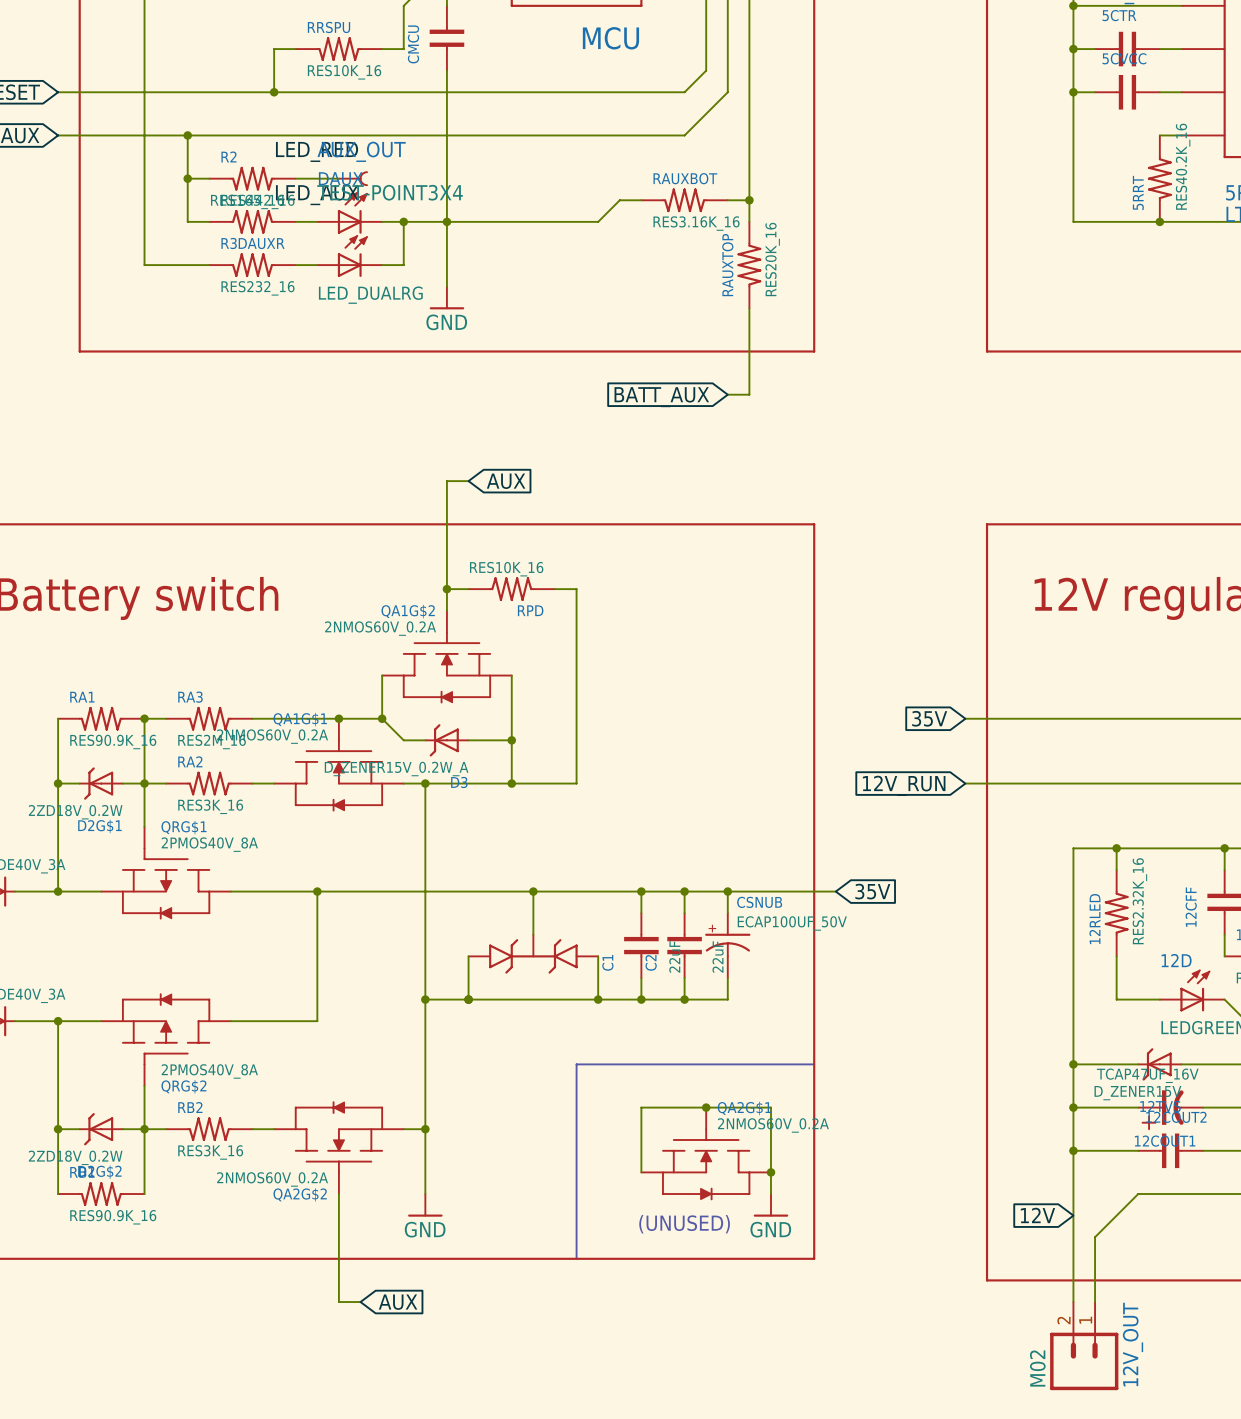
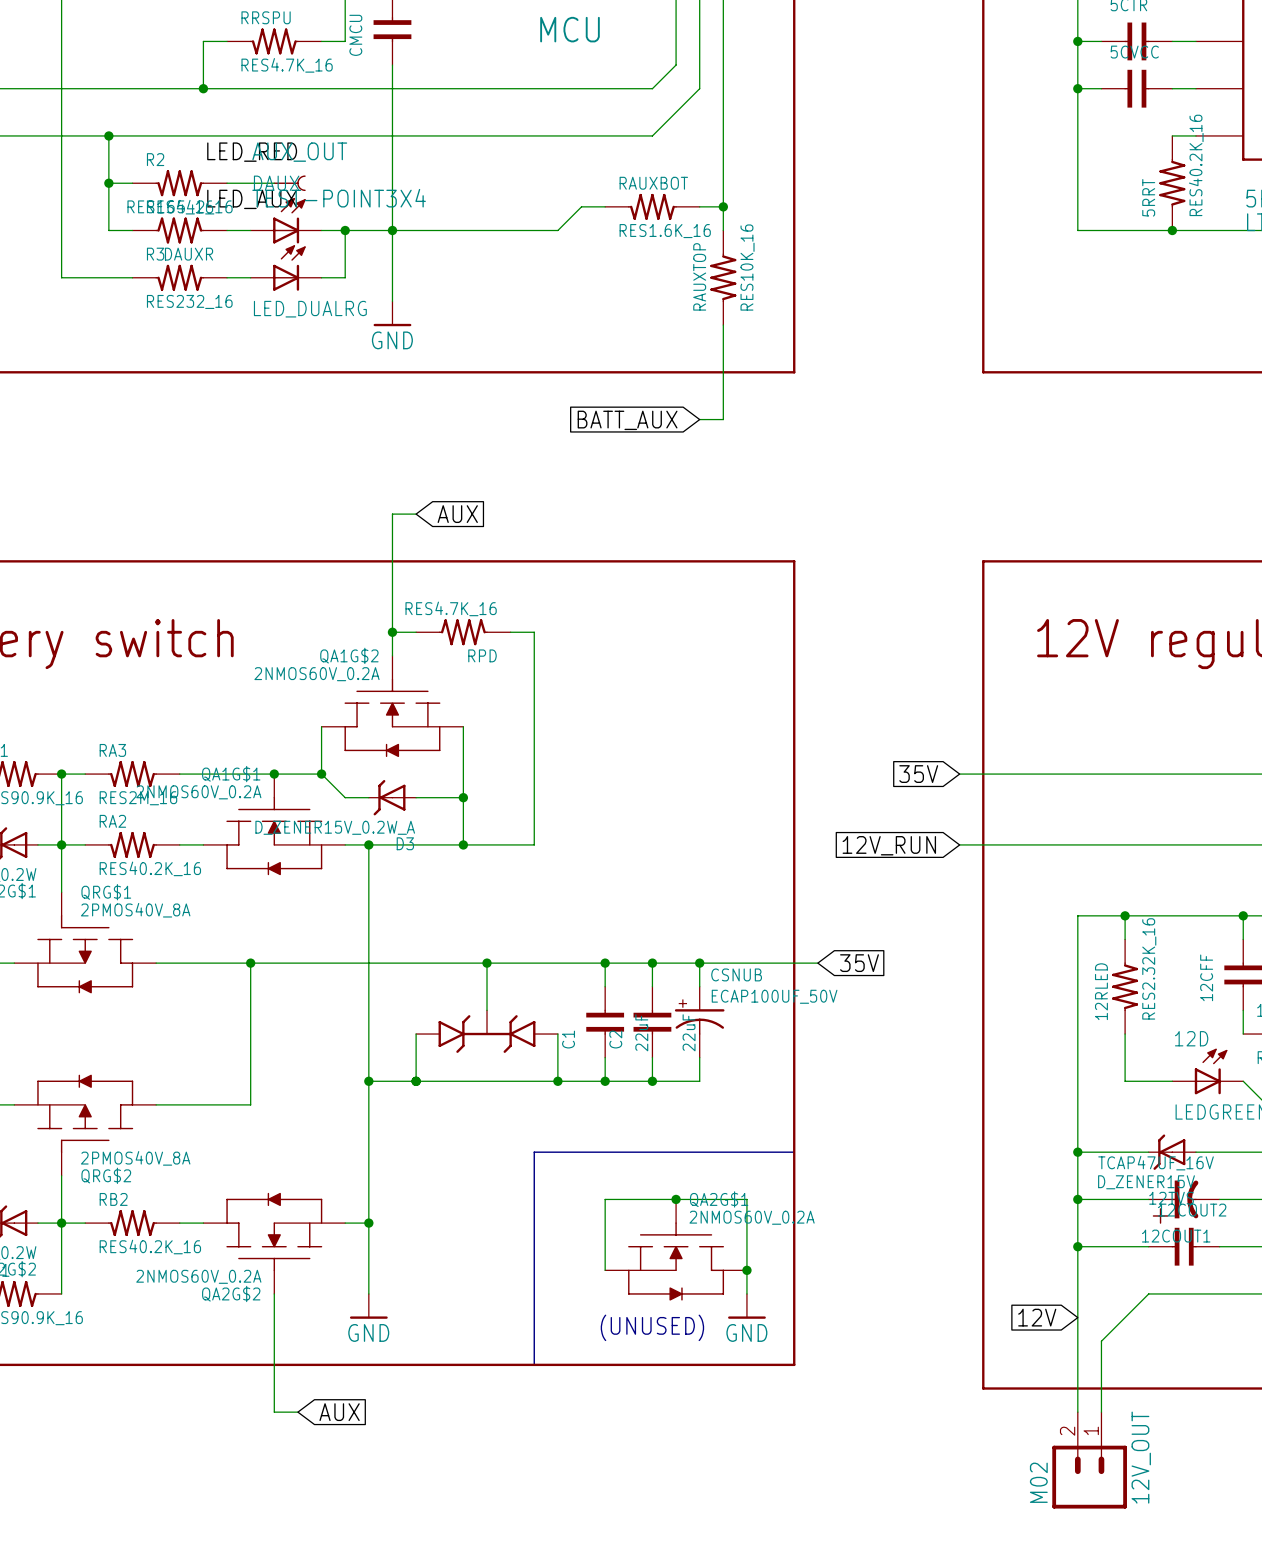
RRSPU value: RES10K_16 (344, 72) -> RES4.7K_16 (287, 65)
RAUXBOT value: RES3.16K_16 (696, 223) -> RES1.6K_16 (665, 231)
RAUXTOP value: RES20K_16 (772, 259) -> RES10K_16 (747, 267)
RPD value: RES10K_16 (506, 569) -> RES4.7K_16 (451, 608)
RA2 value: RES3K_16 (210, 806) -> RES40.2K_16 (150, 868)
RB2 value: RES3K_16 (210, 1152) -> RES40.2K_16 (150, 1246)

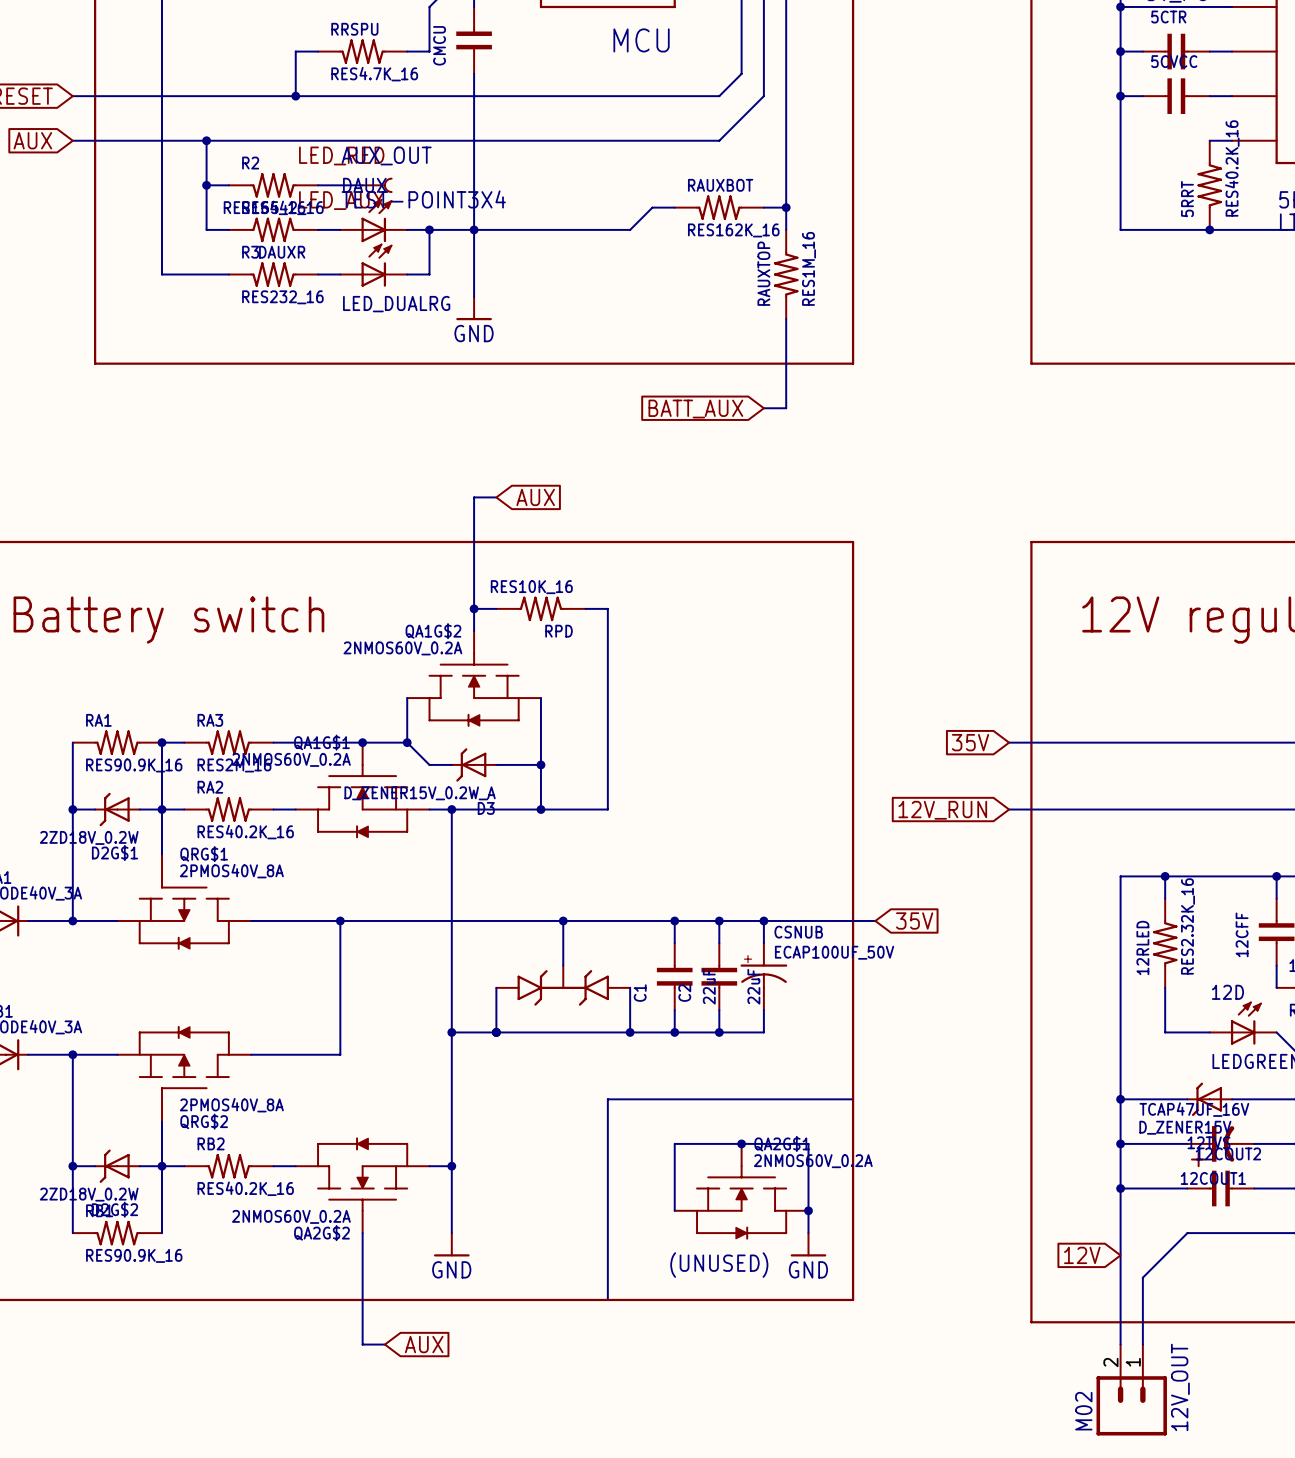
RAUXBOT value: RES1.6K_16 (665, 231) -> RES162K_16 (733, 230)
RAUXTOP value: RES10K_16 (747, 267) -> RES1M_16 (809, 268)
RPD value: RES4.7K_16 (451, 608) -> RES10K_16 (531, 587)

